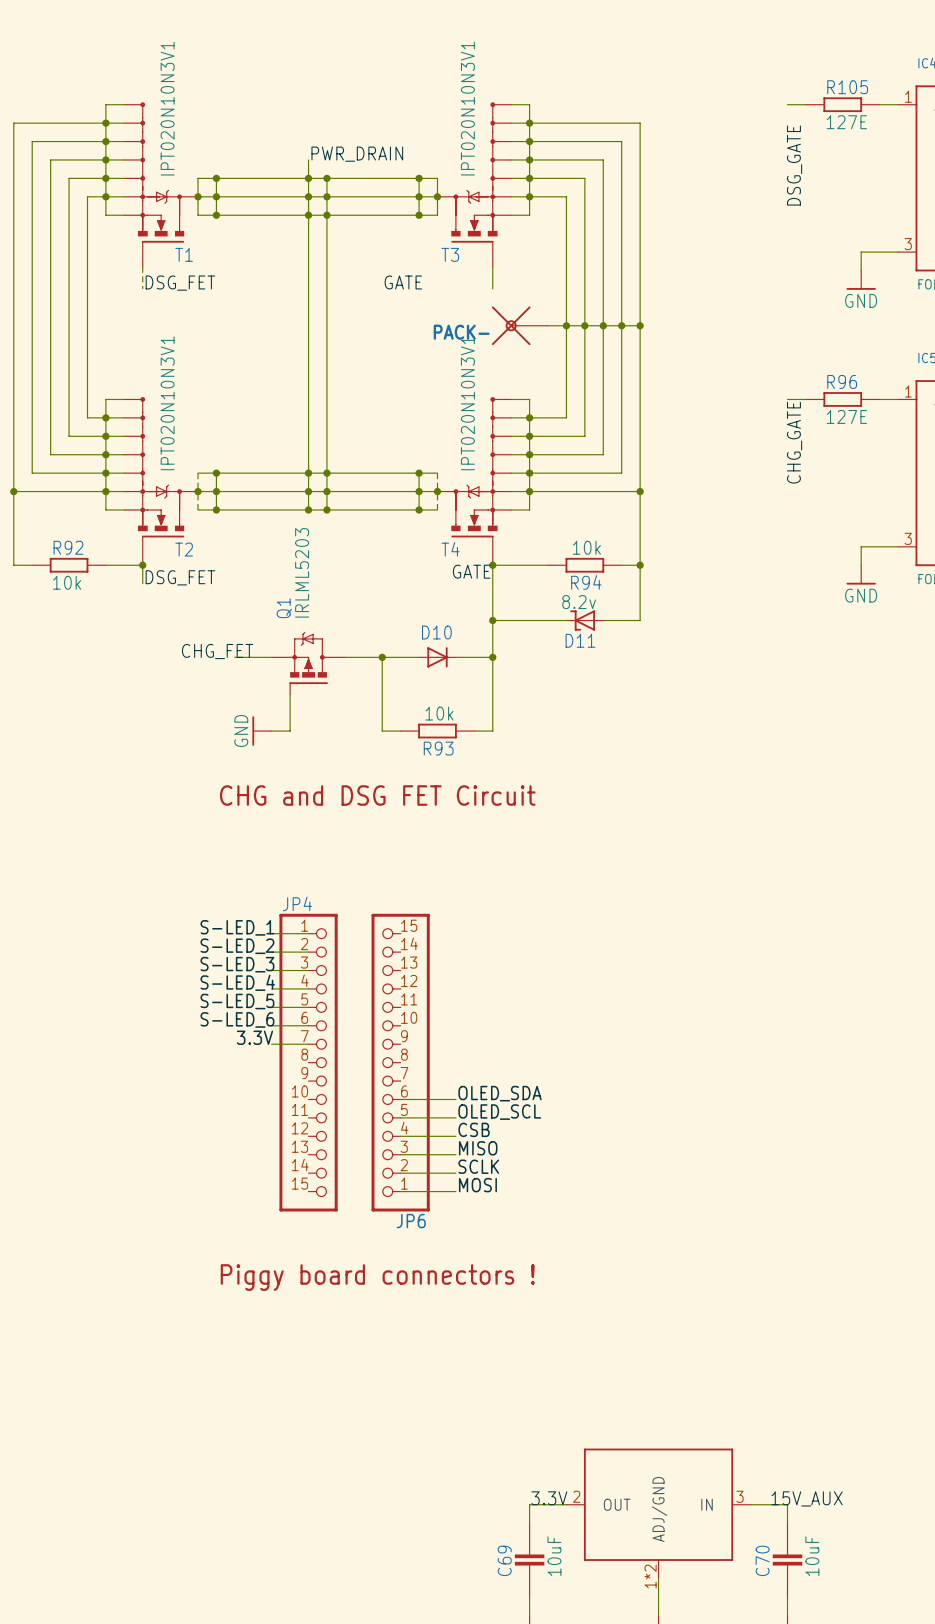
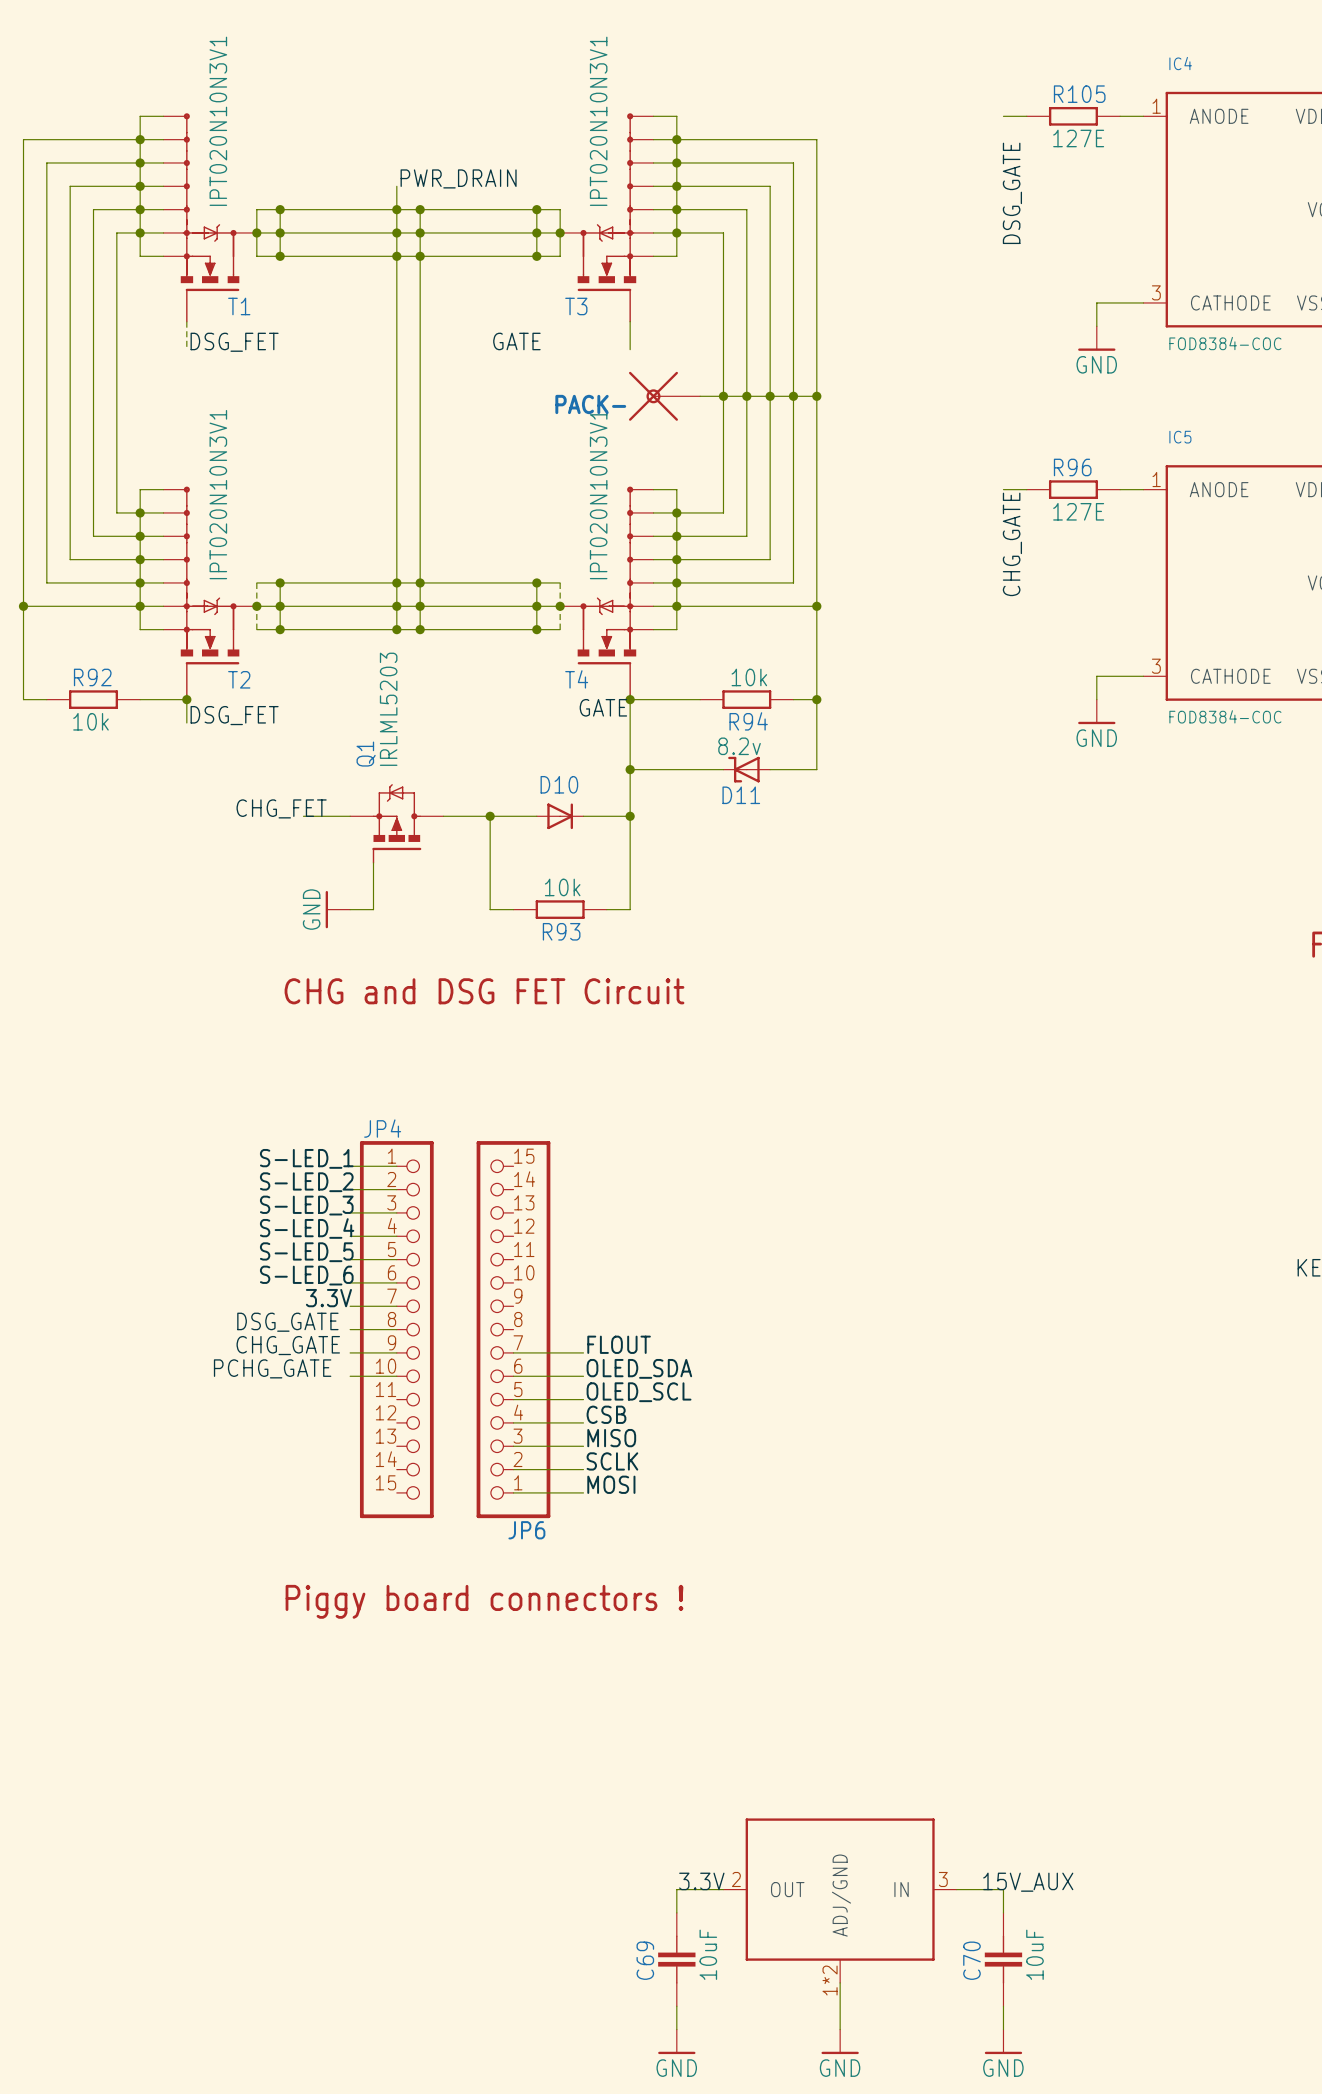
label: none -> DSG_GATE (287, 1322)
wire: none -> (350, 1329) (396, 1329)
label: none -> FLOUT (619, 1344)
label: none -> CHG_GATE (288, 1345)
wire: none -> (350, 1352) (396, 1352)
wire: none -> (513, 1352) (583, 1352)
label: none -> PCHG_GATE (272, 1368)
wire: none -> (350, 1376) (396, 1376)

